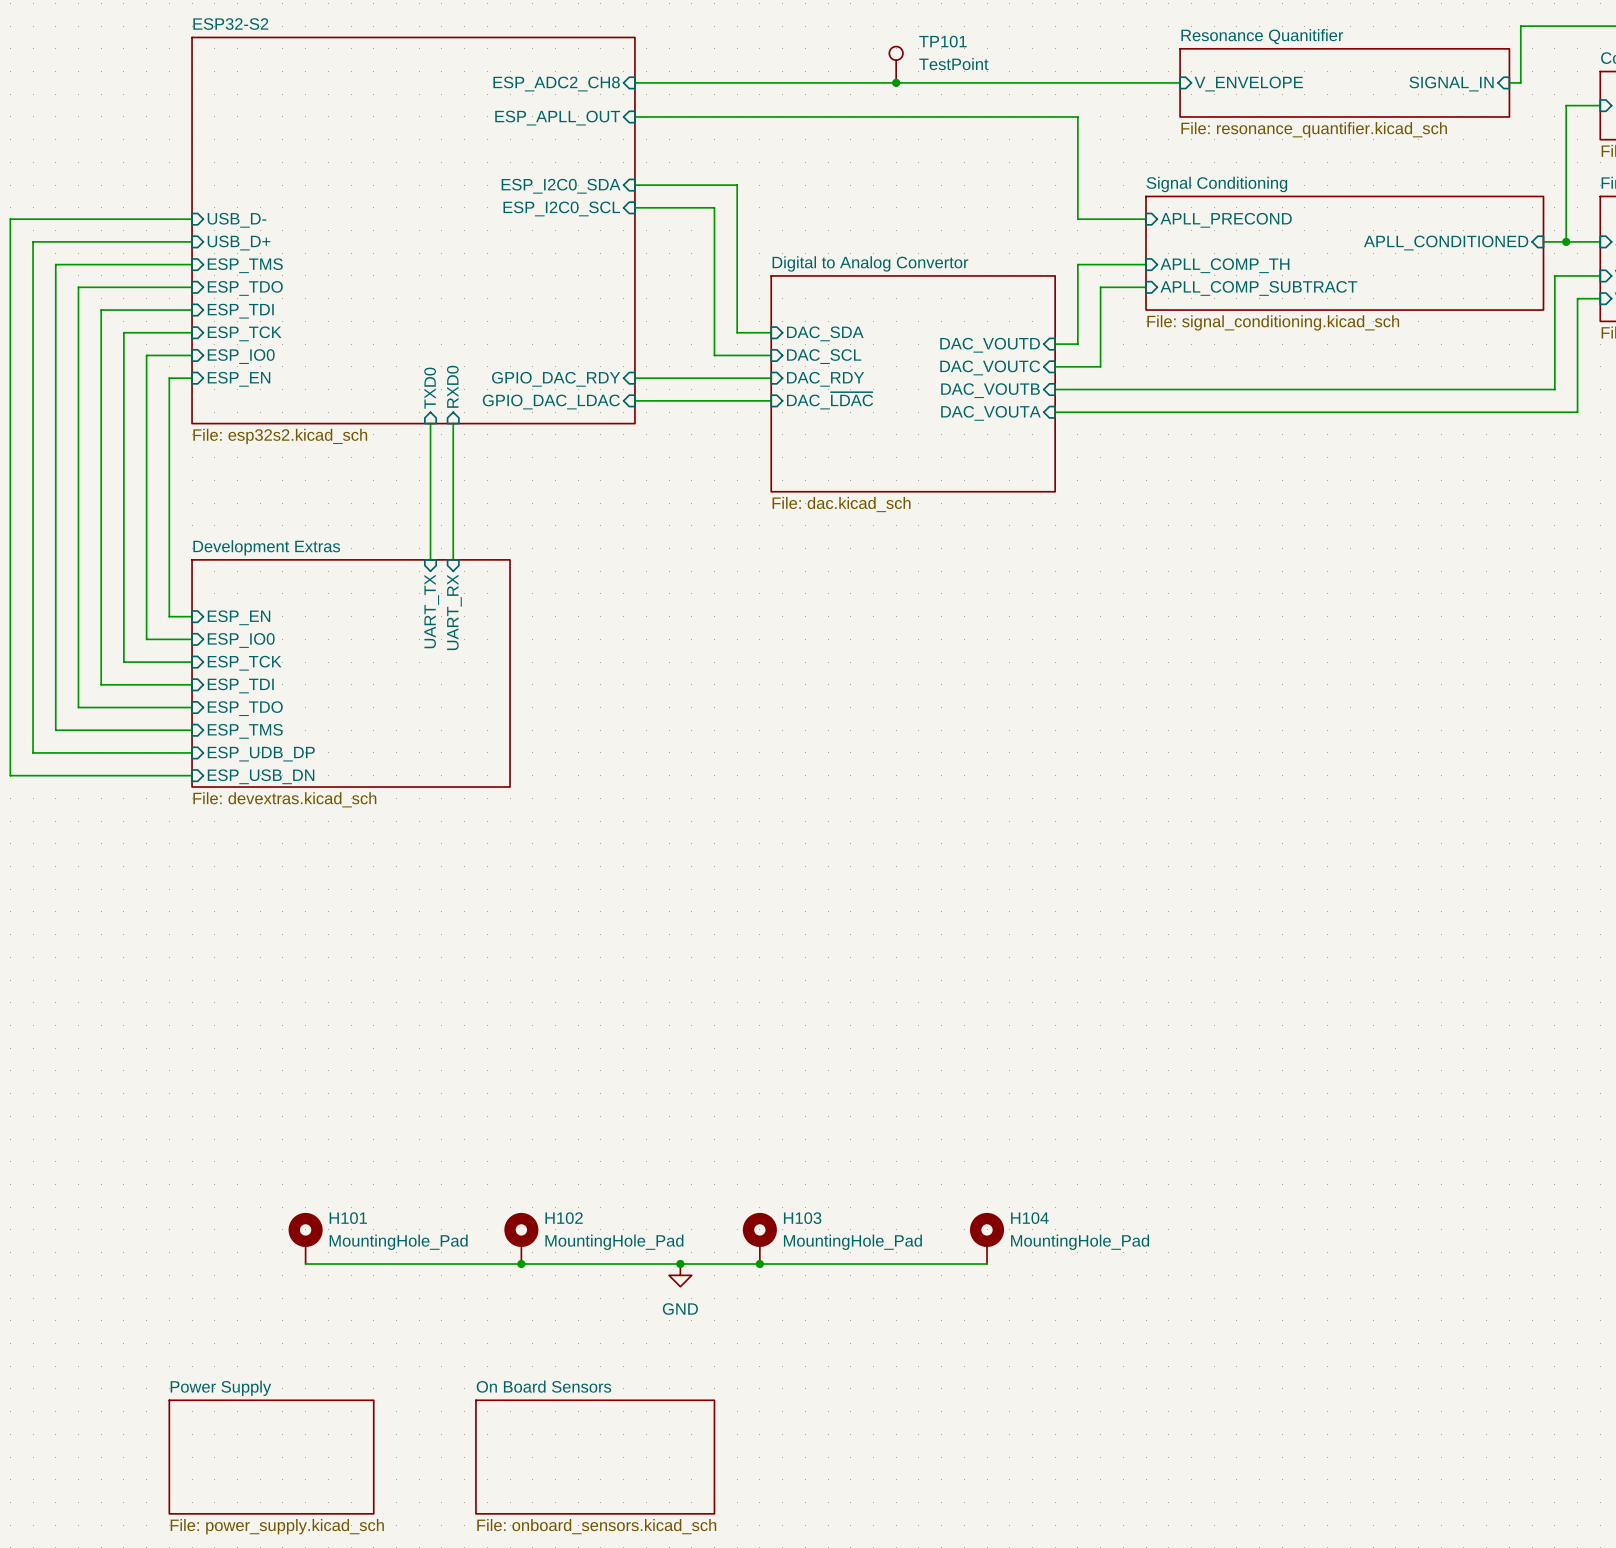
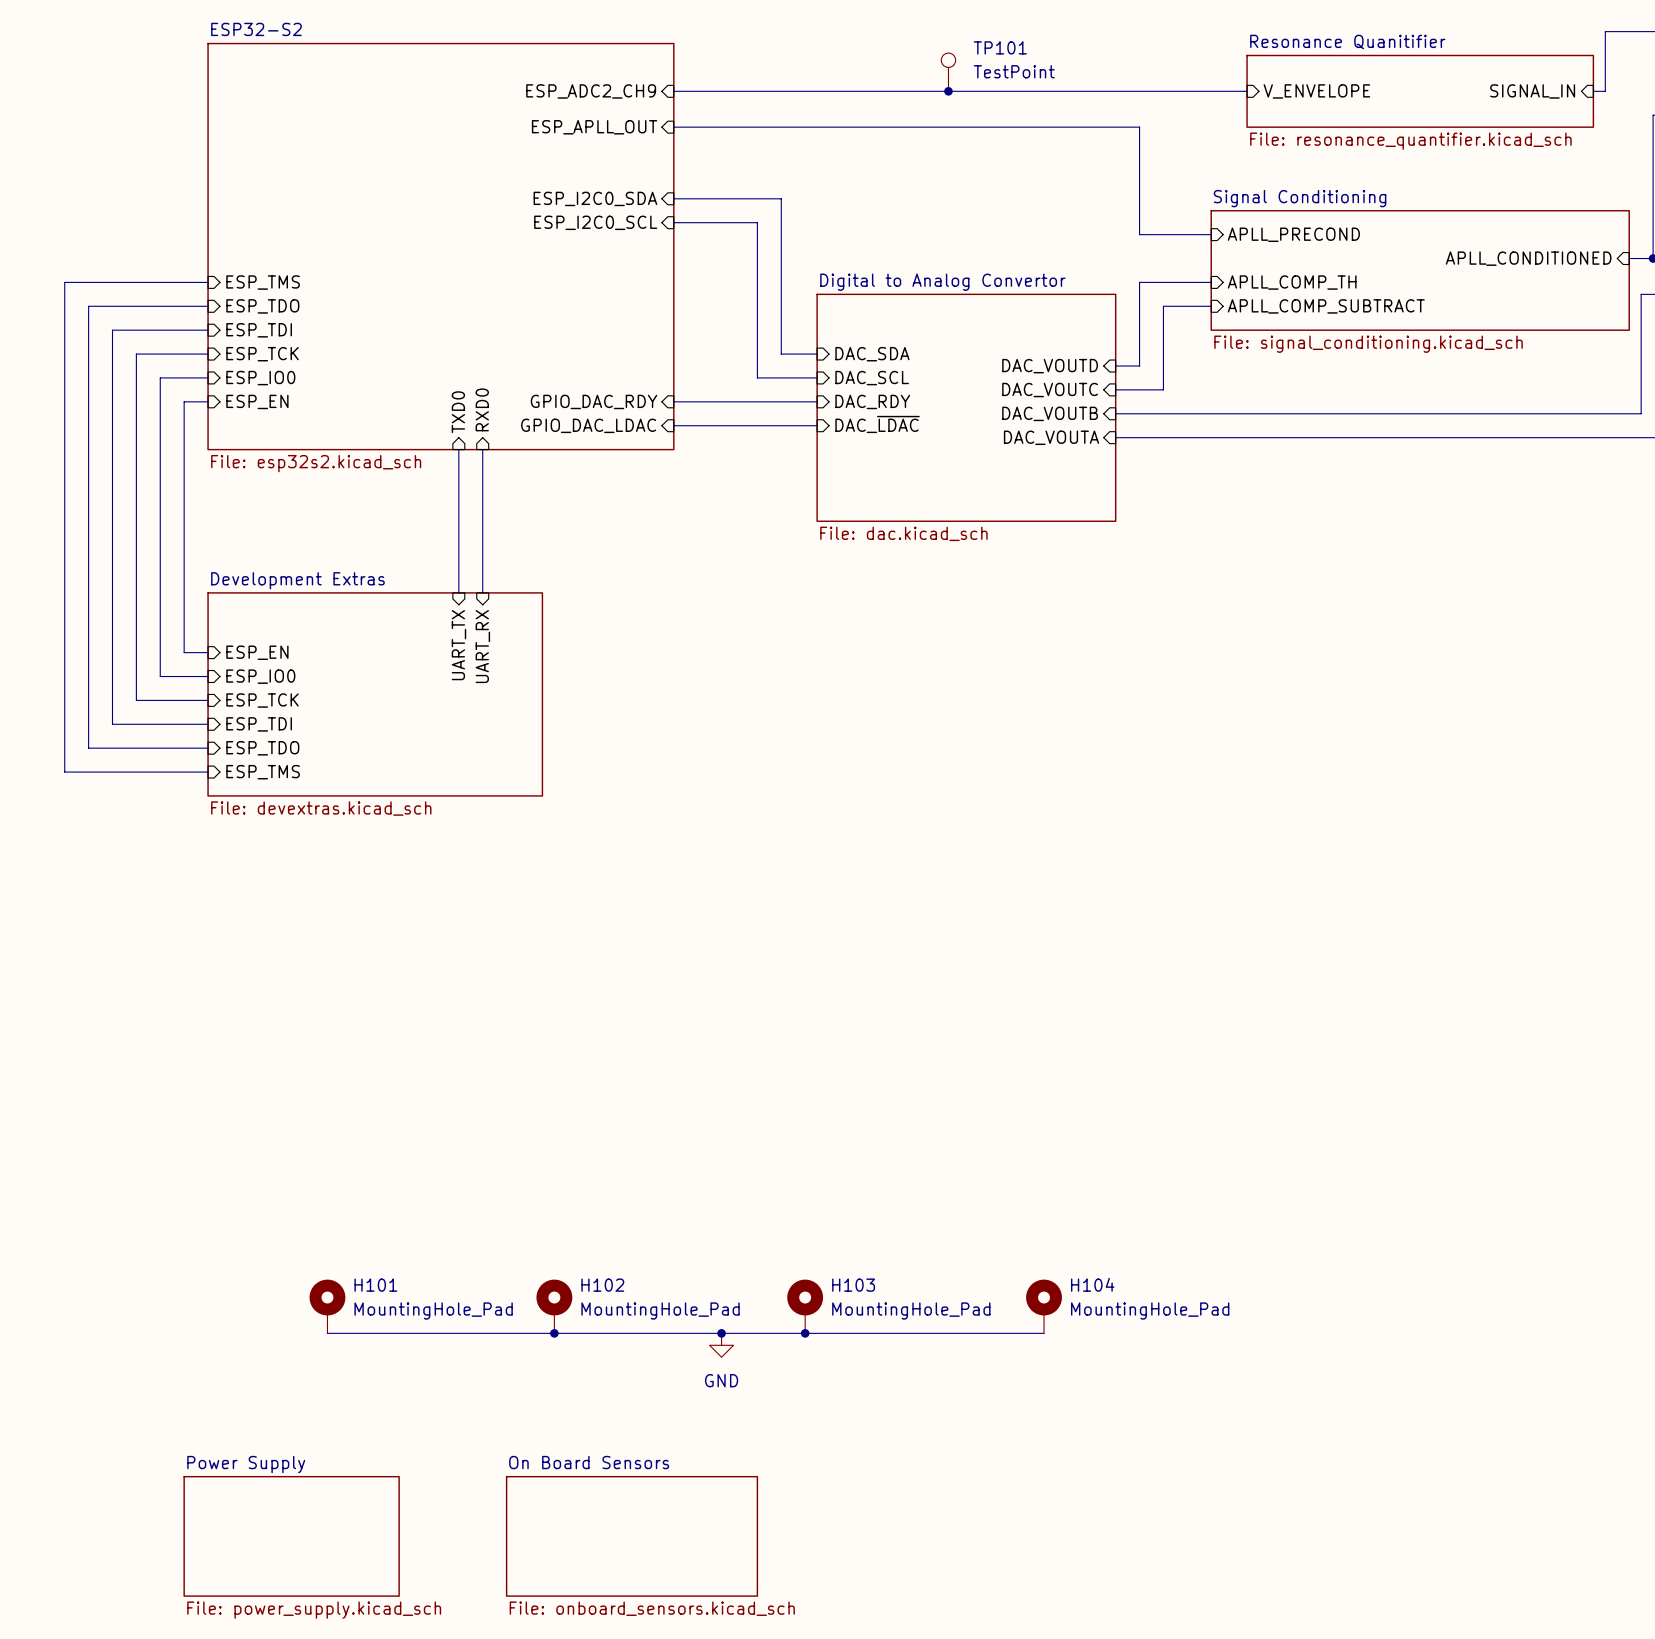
sheet pin: ESP_ADC2_CH8 (556, 84) -> ESP_ADC2_CH9 (591, 91)
wire: (192, 219) (10, 219) (10, 775) (192, 775) -> none
sheet pin: USB_D- (237, 220) -> none
wire: (192, 241) (33, 241) (33, 752) (192, 752) -> none
sheet pin: USB_D+ (239, 243) -> none
sheet Development Extras: none -> File: devextras.kicad_sch (375, 694)
sheet Development Extras: File: devextras.kicad_sch (351, 673) -> none
sheet pin: ESP_UDB_DP (261, 754) -> none
sheet pin: ESP_USB_DN (261, 776) -> none

